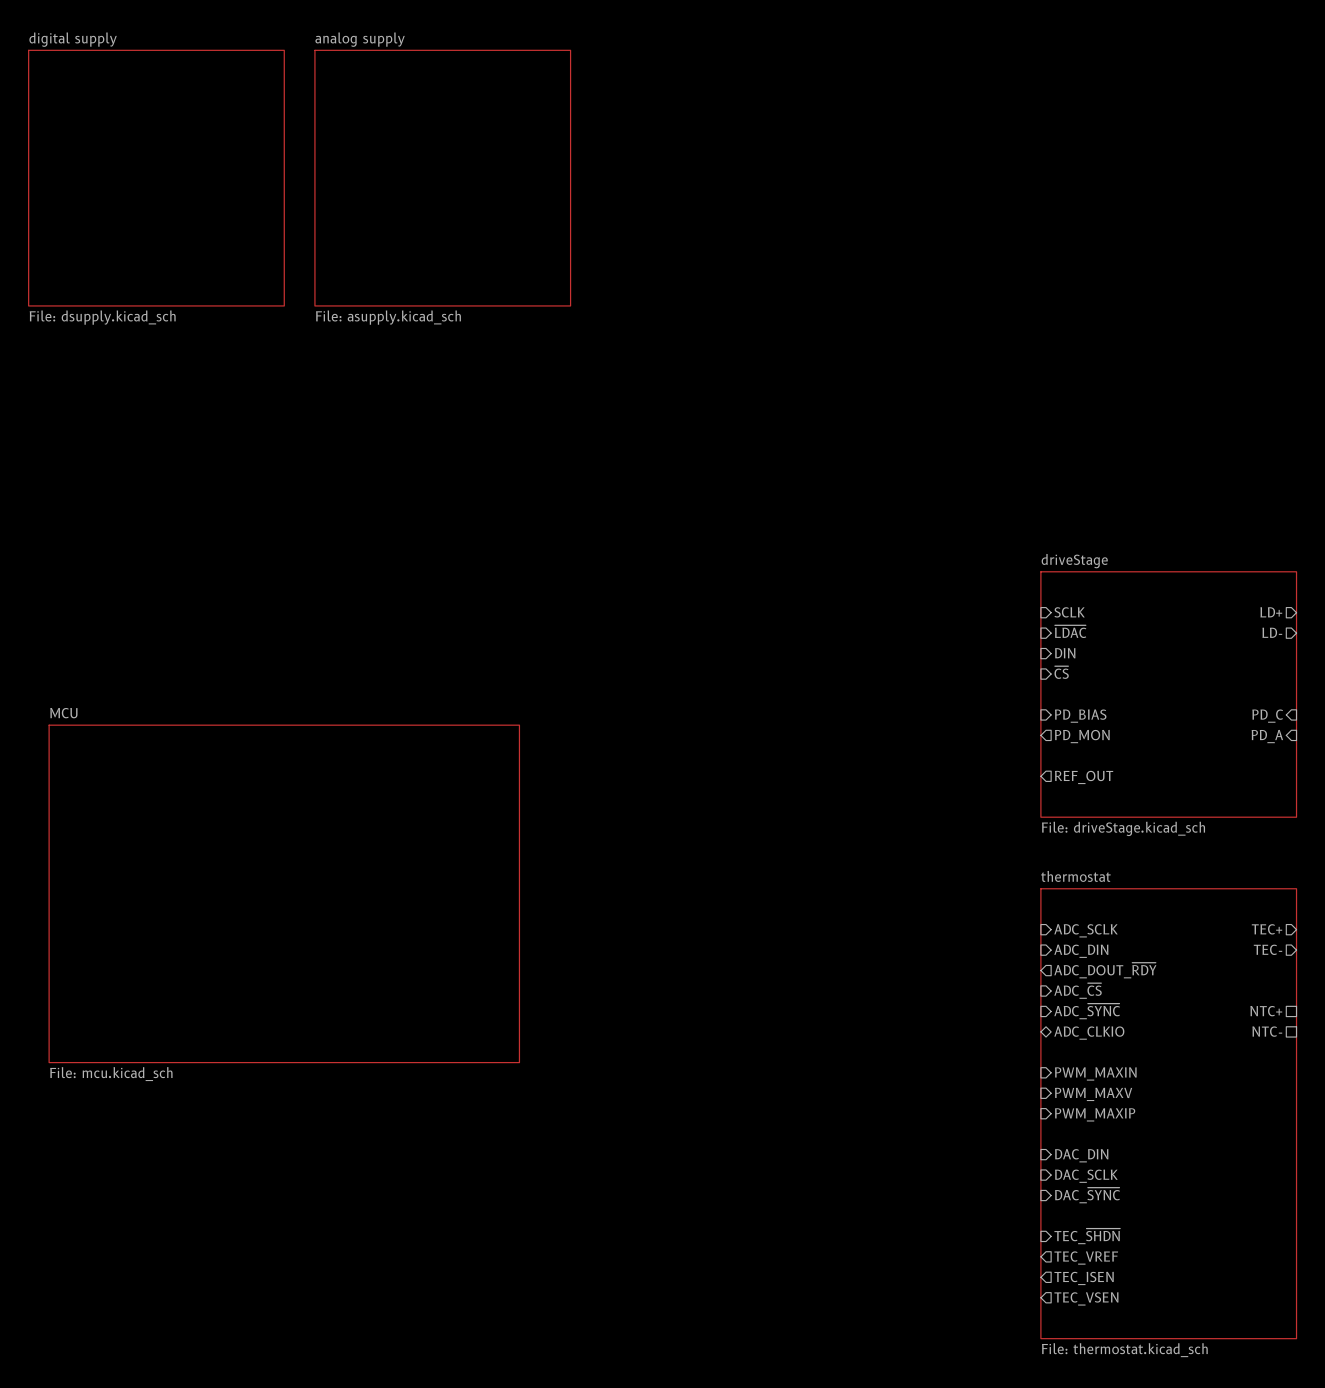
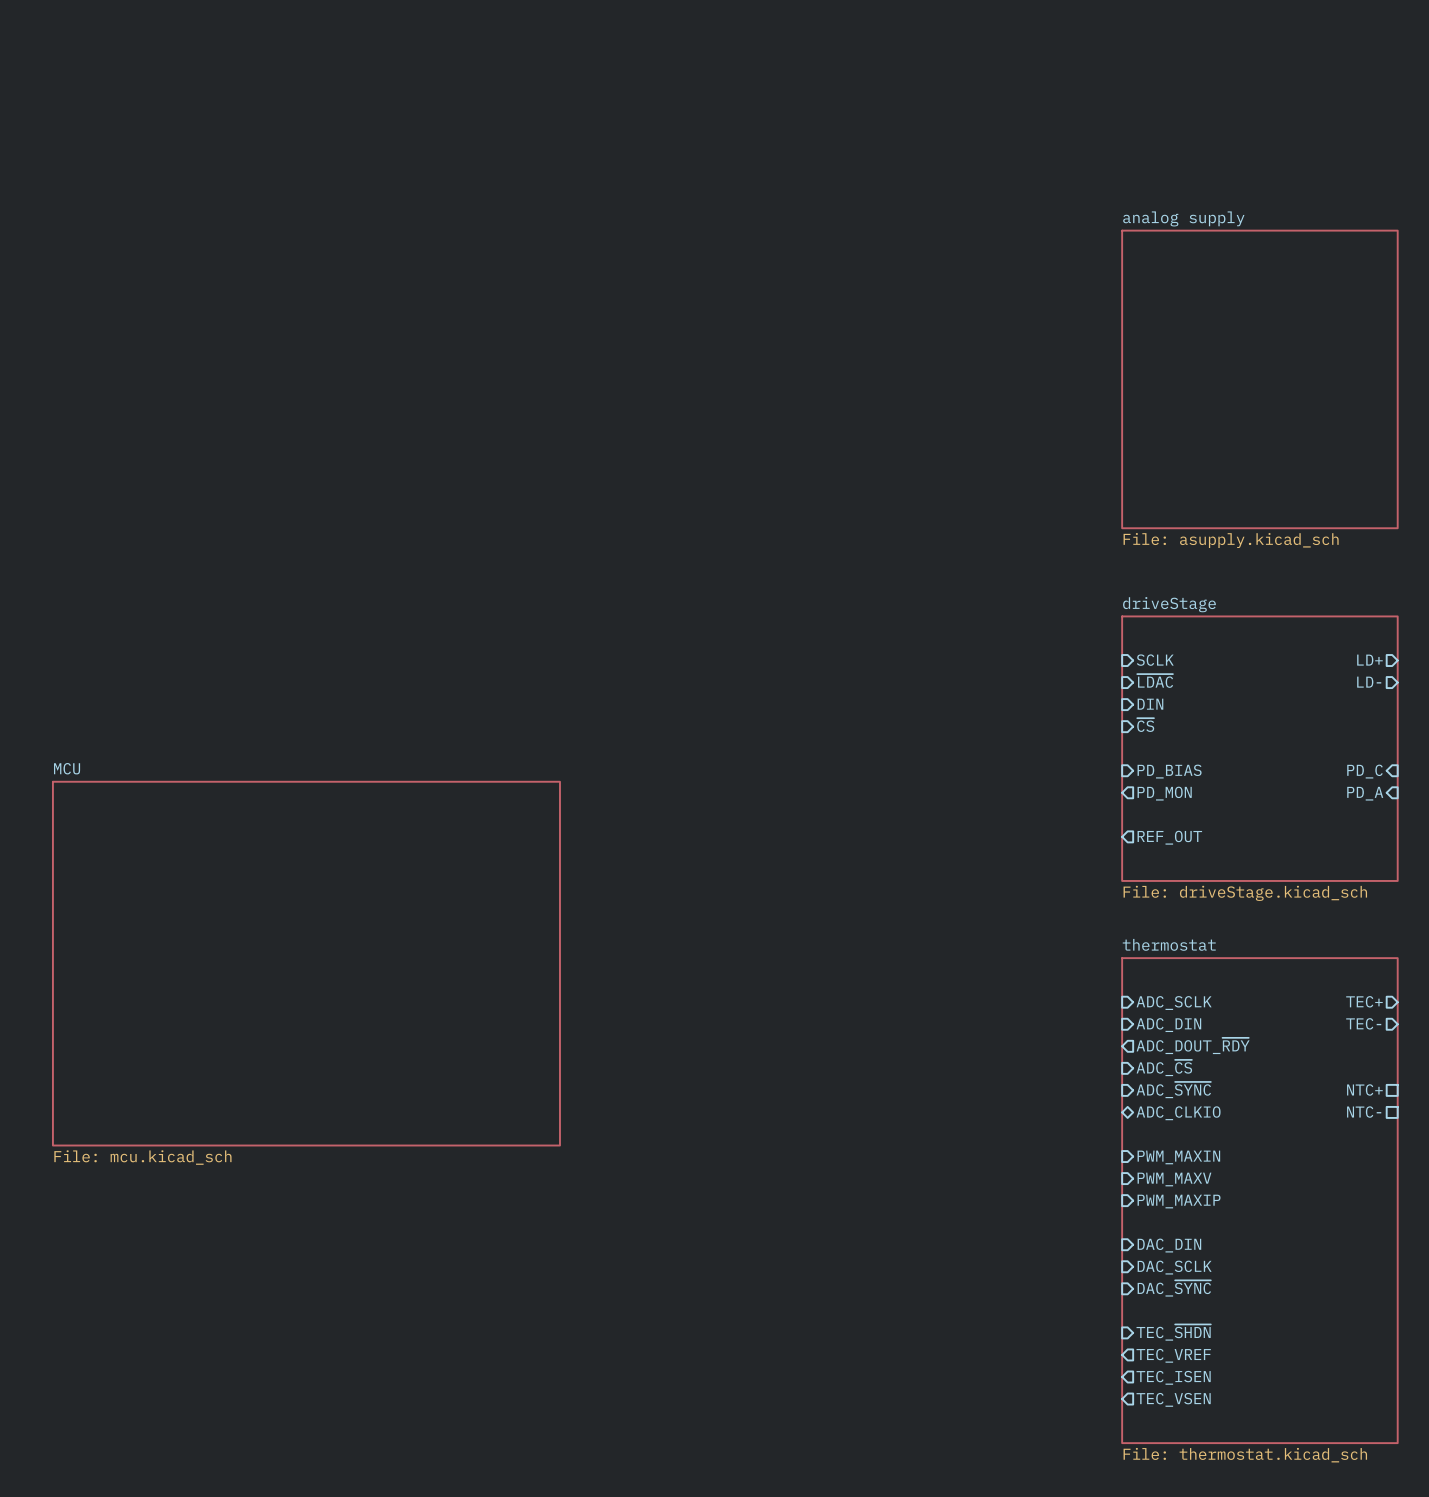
sheet digital supply: File: dsupply.kicad_sch (156, 178) -> none
sheet analog supply: File: asupply.kicad_sch (442, 178) -> none
sheet analog supply: none -> File: asupply.kicad_sch (1259, 379)

